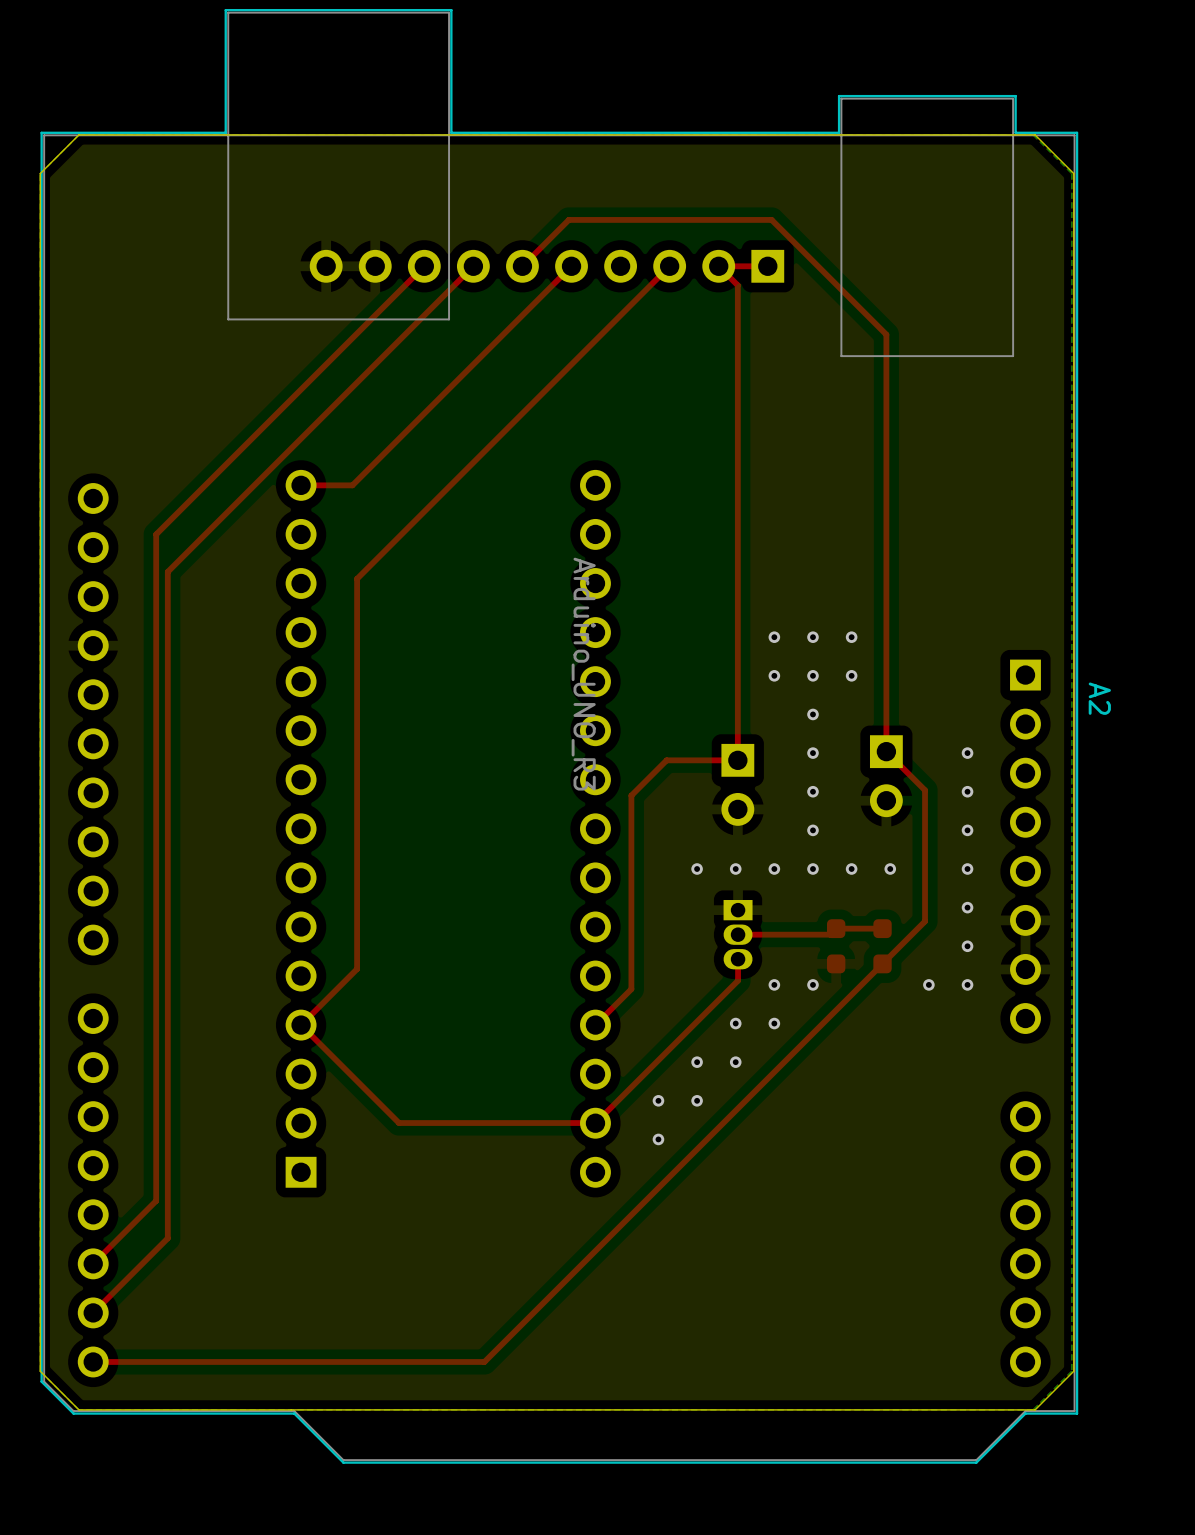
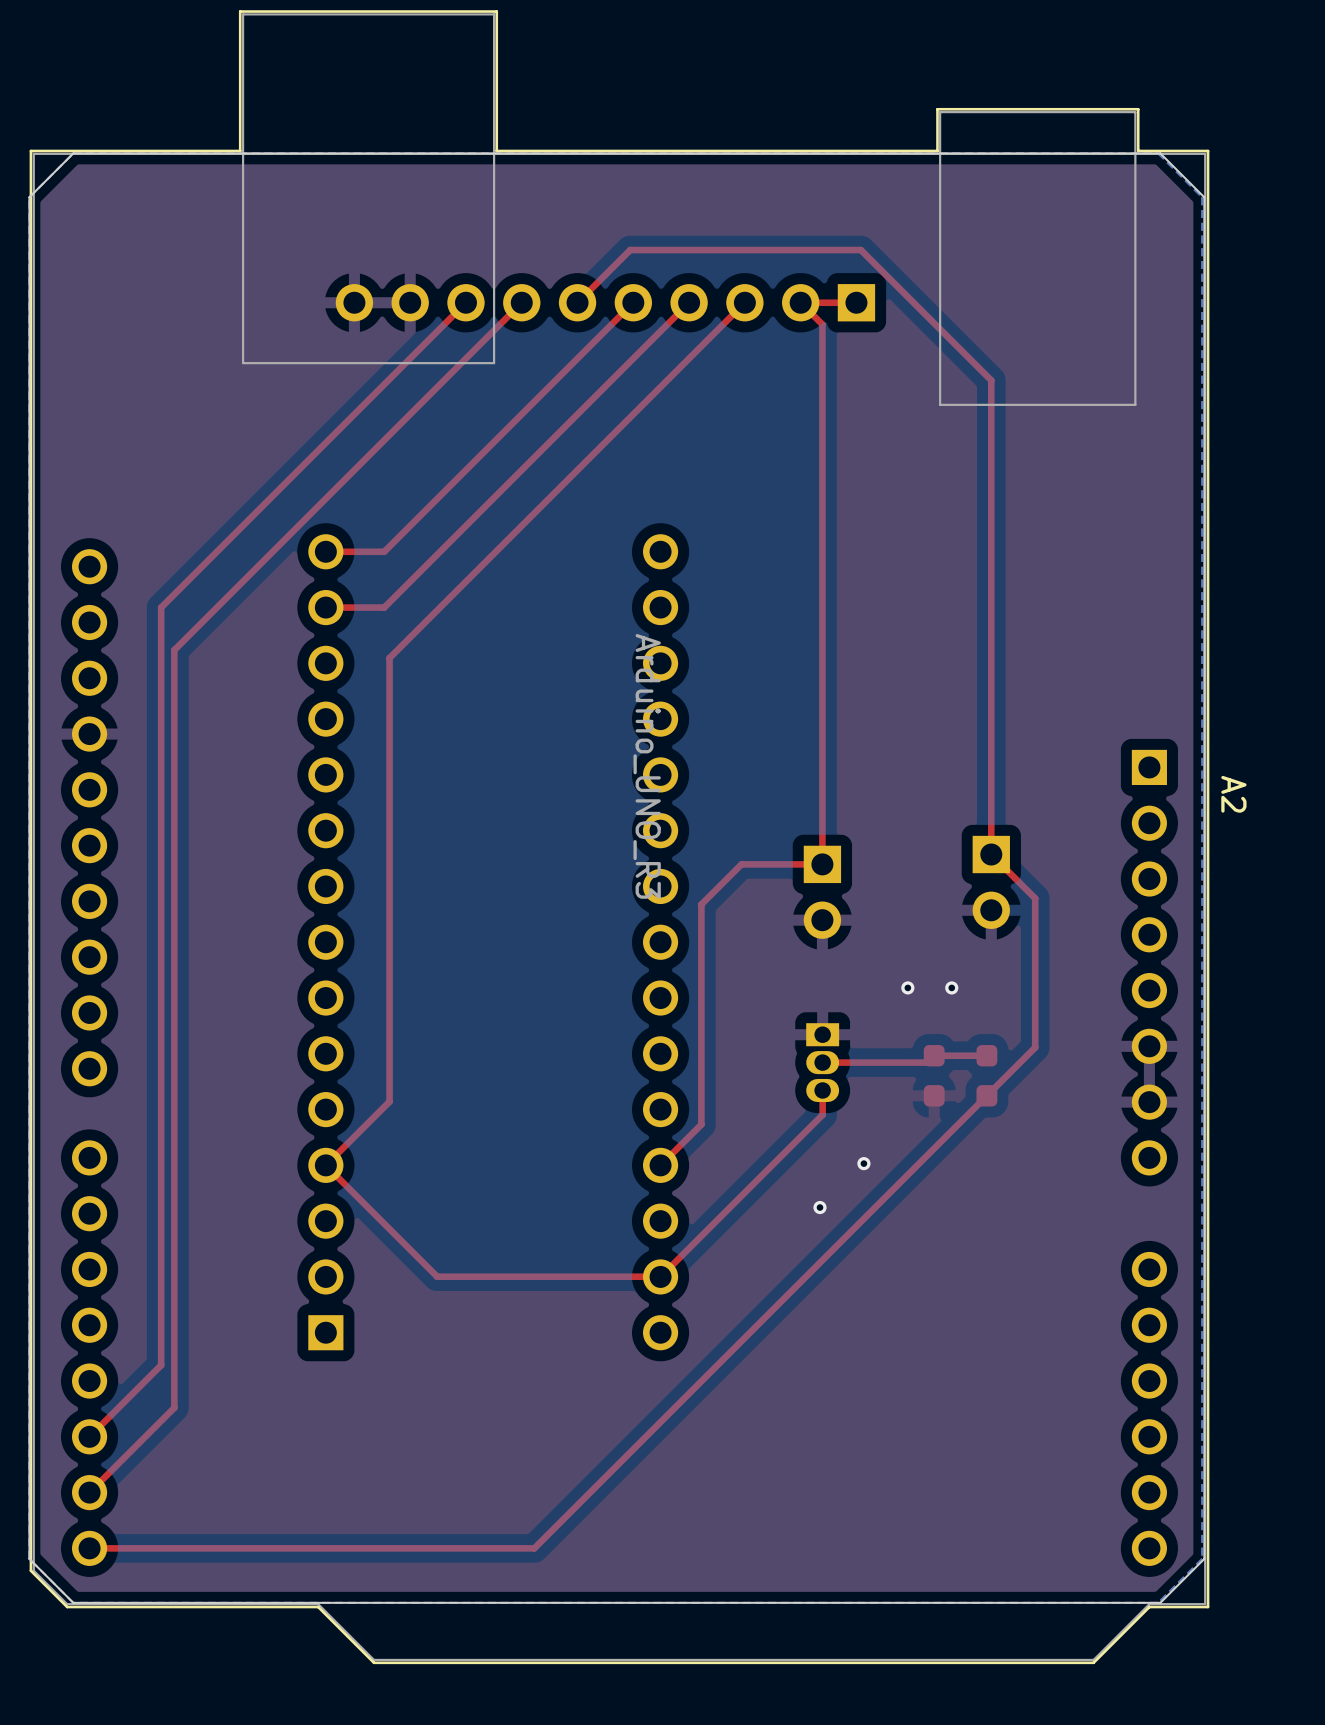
top track: none -> (689, 302) (384, 607) (325, 607)
via: (774, 637) -> none
via: (812, 637) -> none
via: (851, 637) -> none
via: (774, 675) -> none
via: (812, 675) -> none
via: (851, 675) -> none
via: (812, 714) -> none
via: (812, 753) -> none
via: (967, 753) -> none
via: (812, 791) -> none
via: (967, 791) -> none
via: (812, 830) -> none
via: (967, 830) -> none
via: (697, 869) -> none
via: (735, 869) -> none
via: (774, 869) -> none
via: (890, 869) -> none
via: (967, 869) -> none
via: (967, 907) -> none
via: (967, 946) -> none
via: (774, 984) -> none
via: (812, 984) -> none
via: (928, 984) -> none
via: (967, 984) -> none
via: (735, 1023) -> none
via: (697, 1062) -> none
via: (658, 1100) -> none
via: (697, 1100) -> none
via: (658, 1139) -> none

